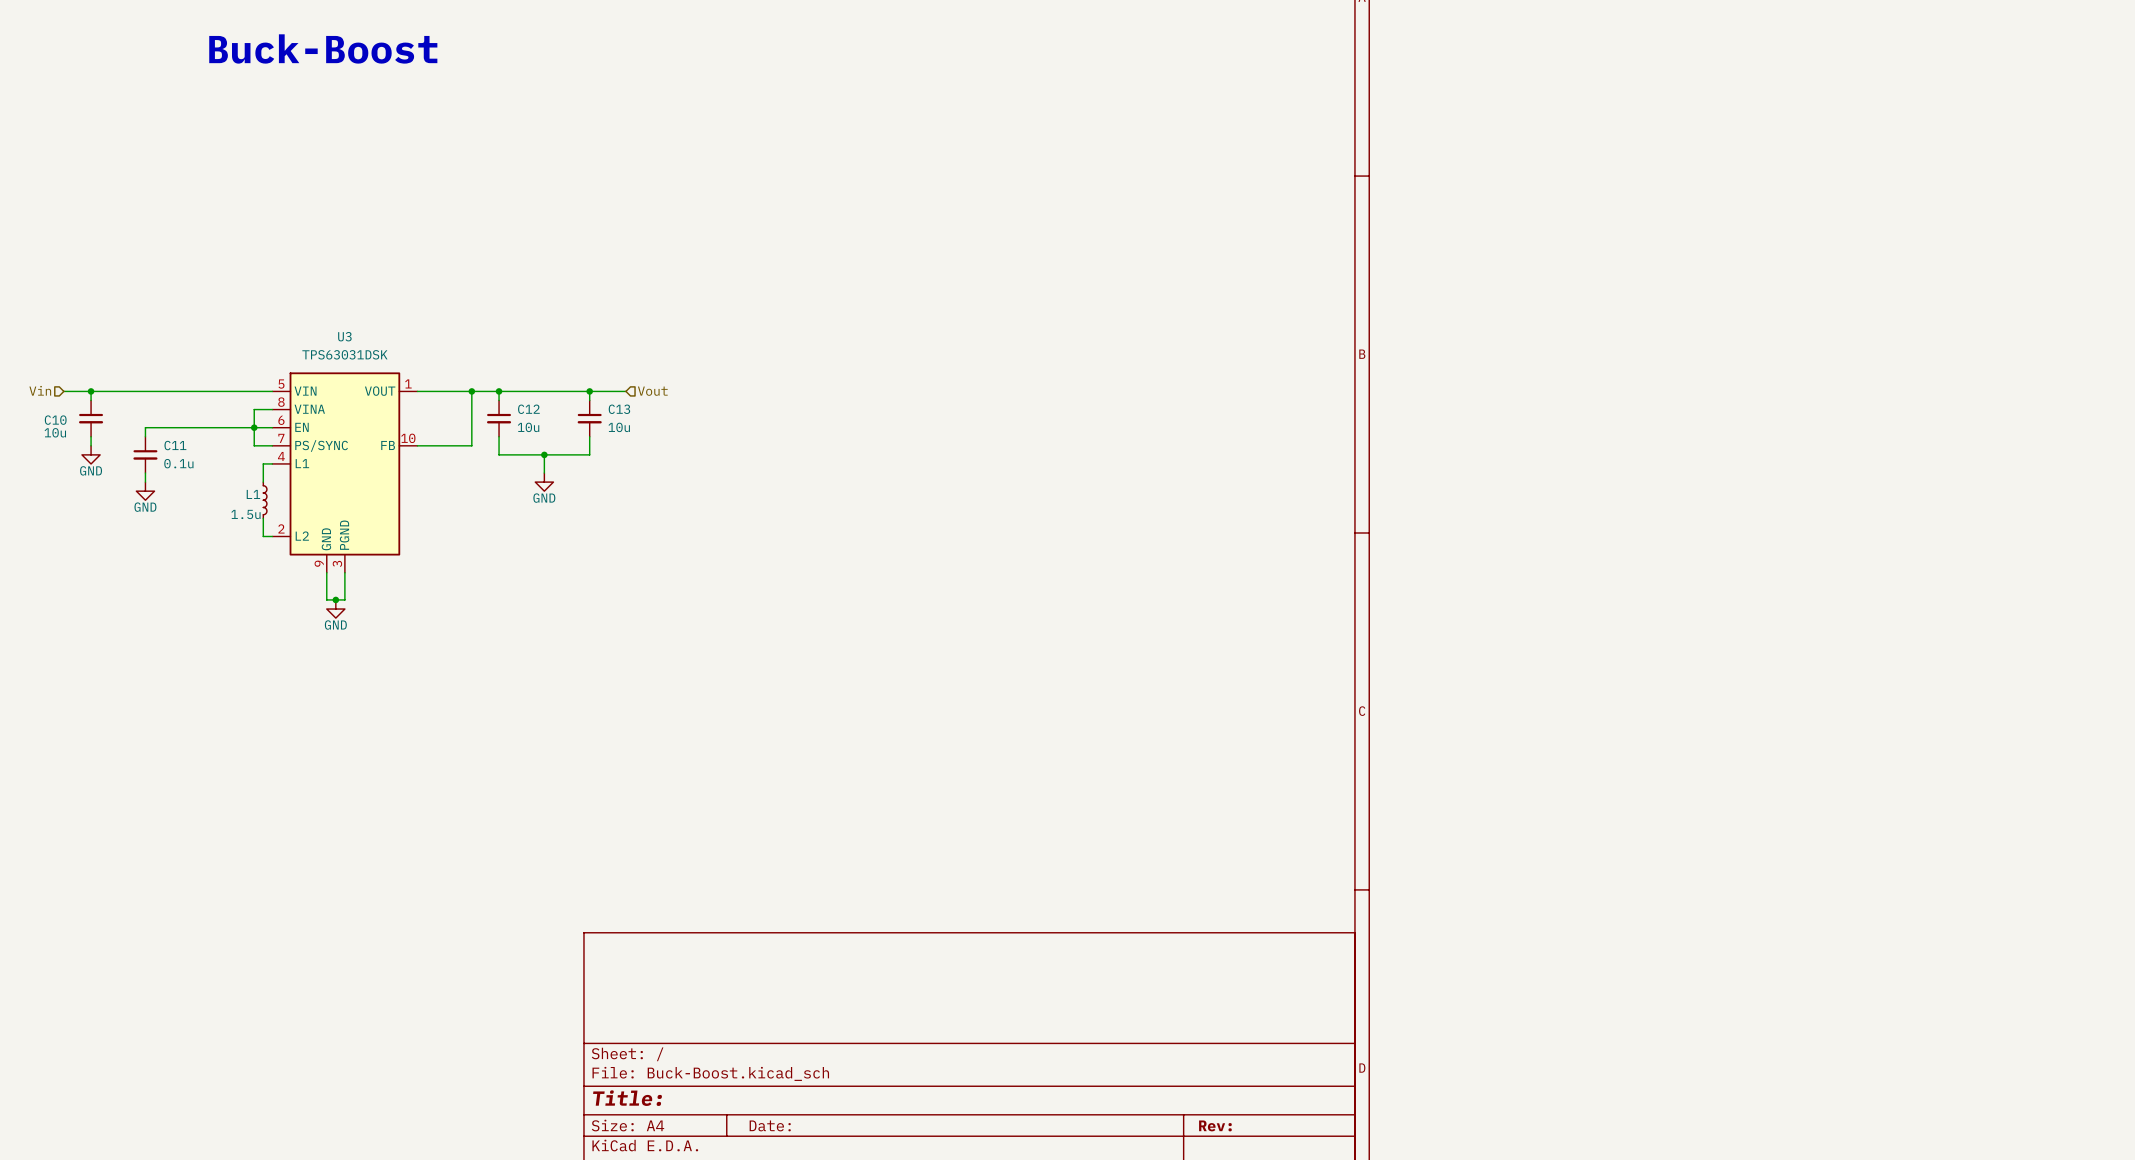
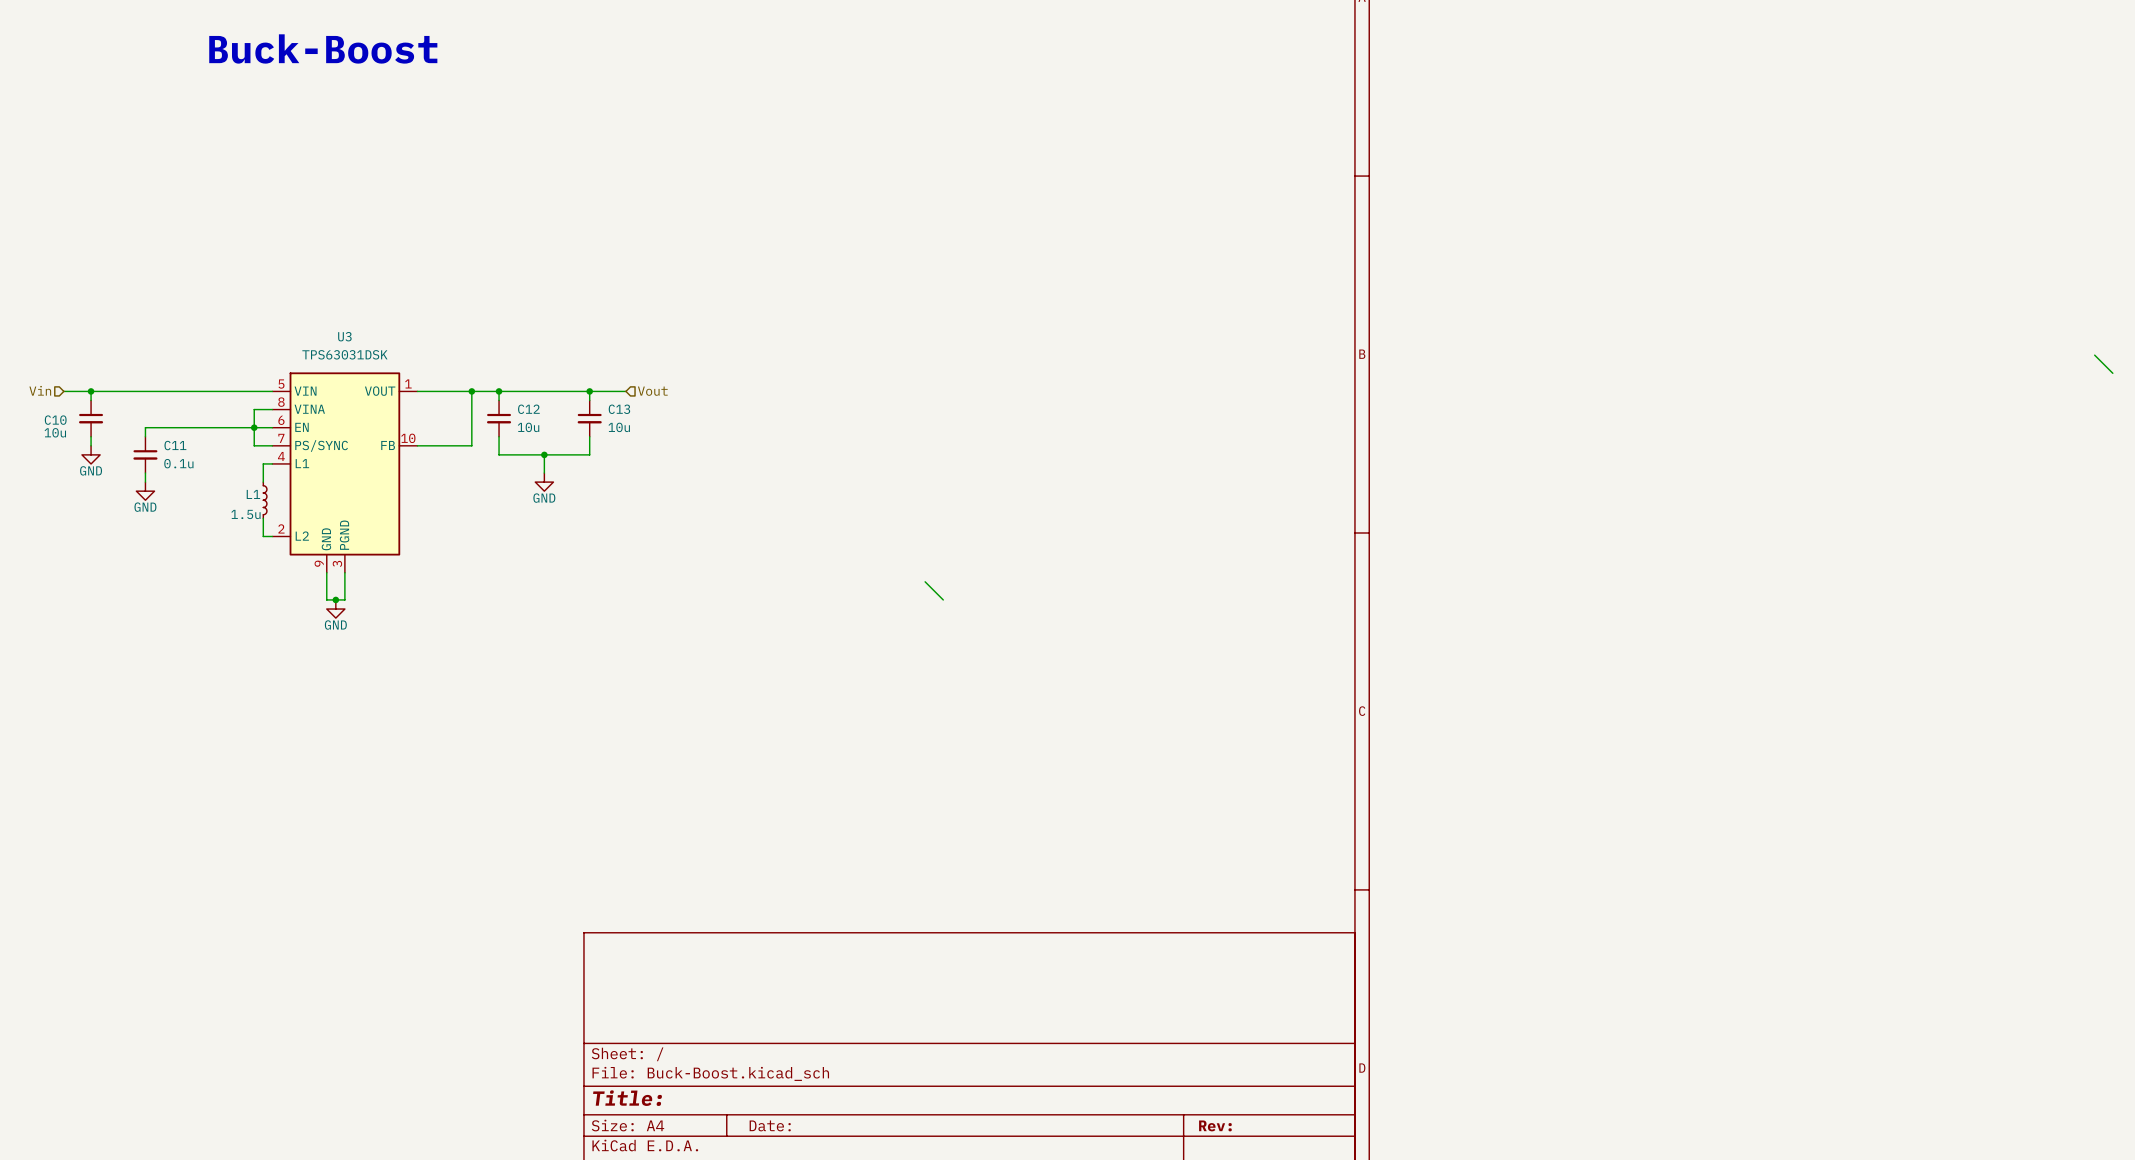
wire: none -> (2094, 355) (2112, 373)
wire: none -> (925, 581) (943, 599)

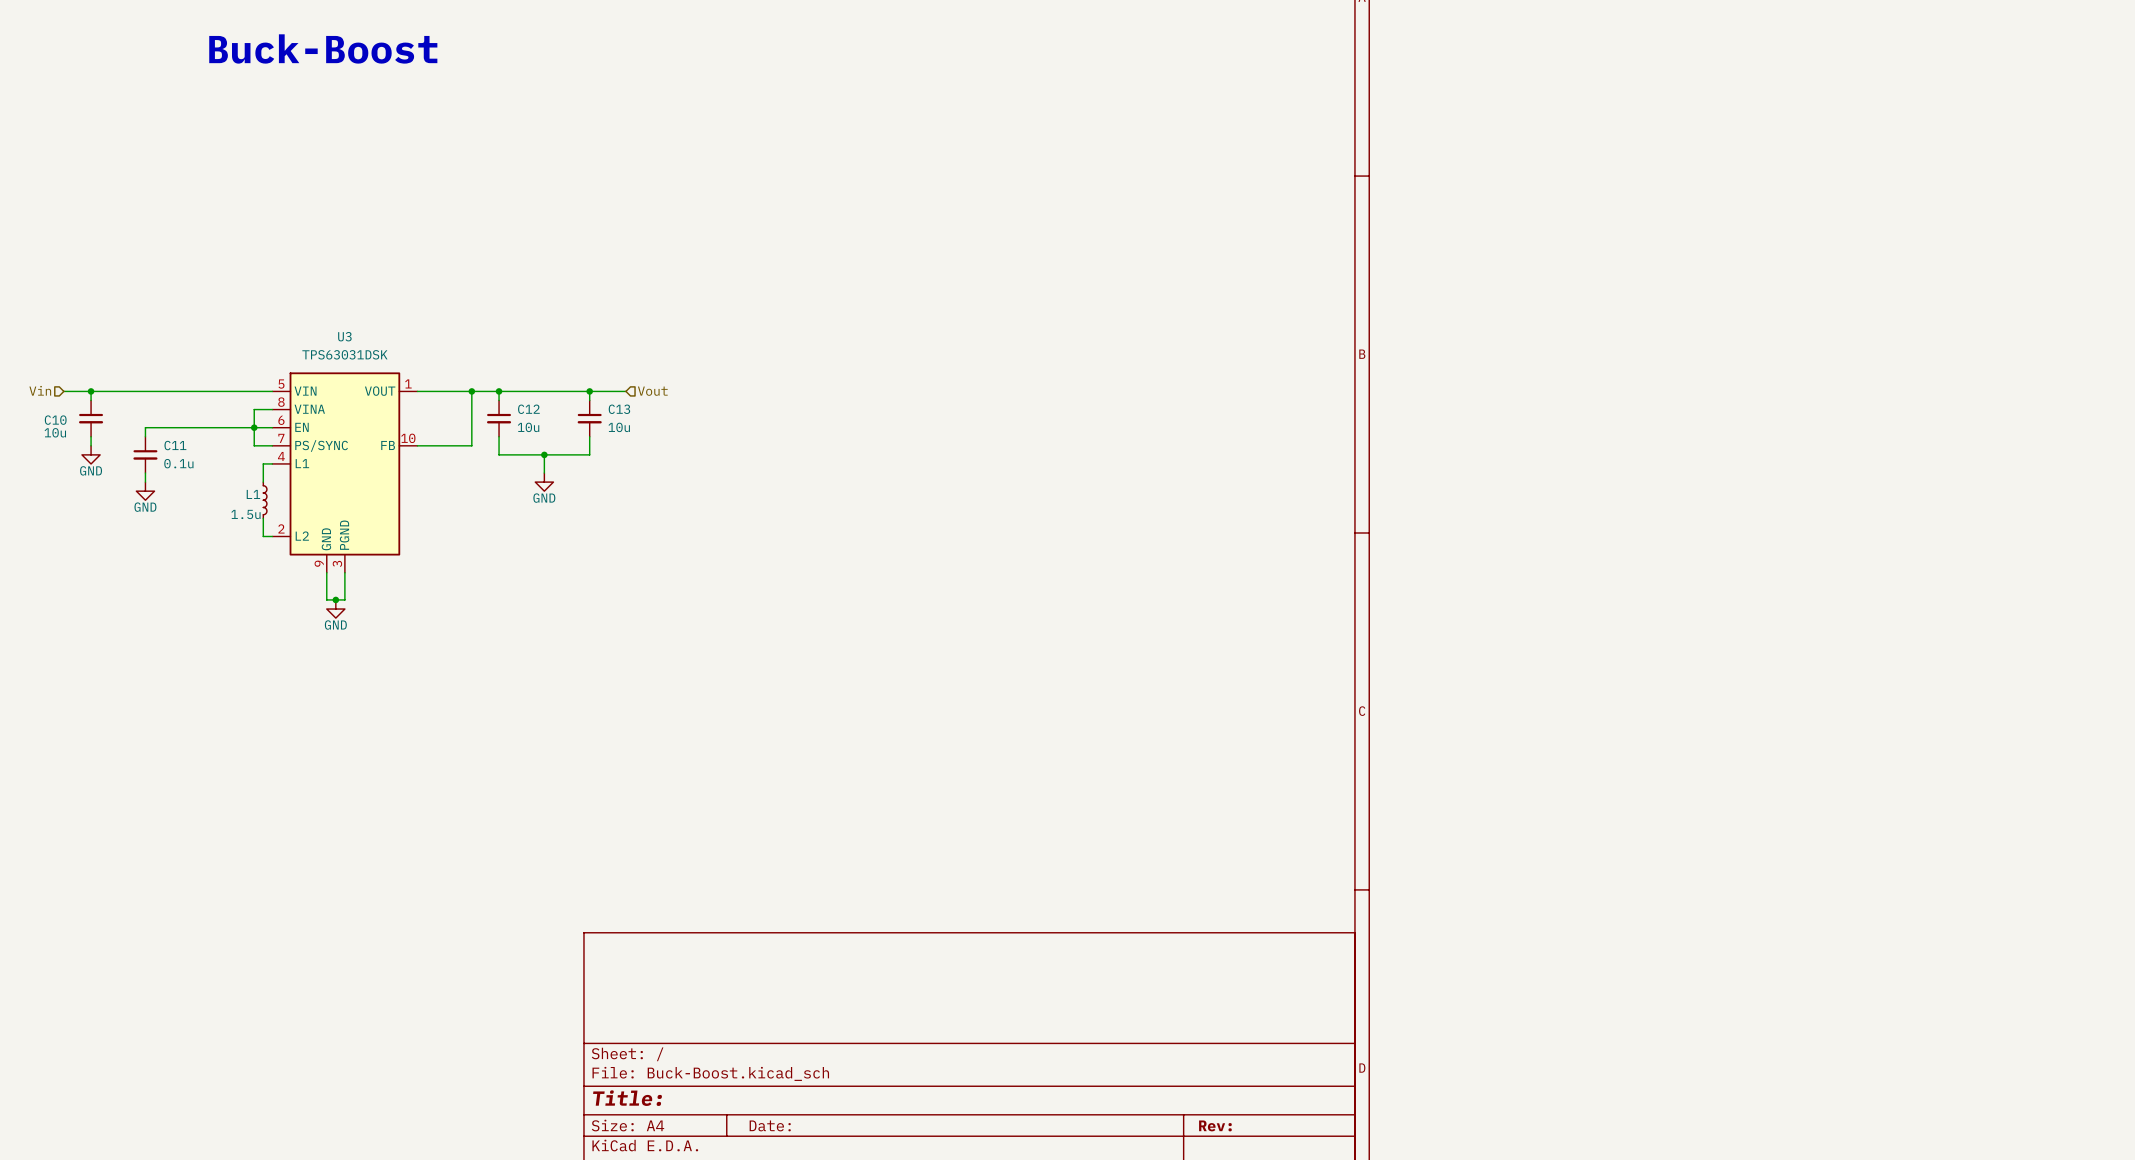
wire: (2094, 355) (2112, 373) -> none
wire: (925, 581) (943, 599) -> none

